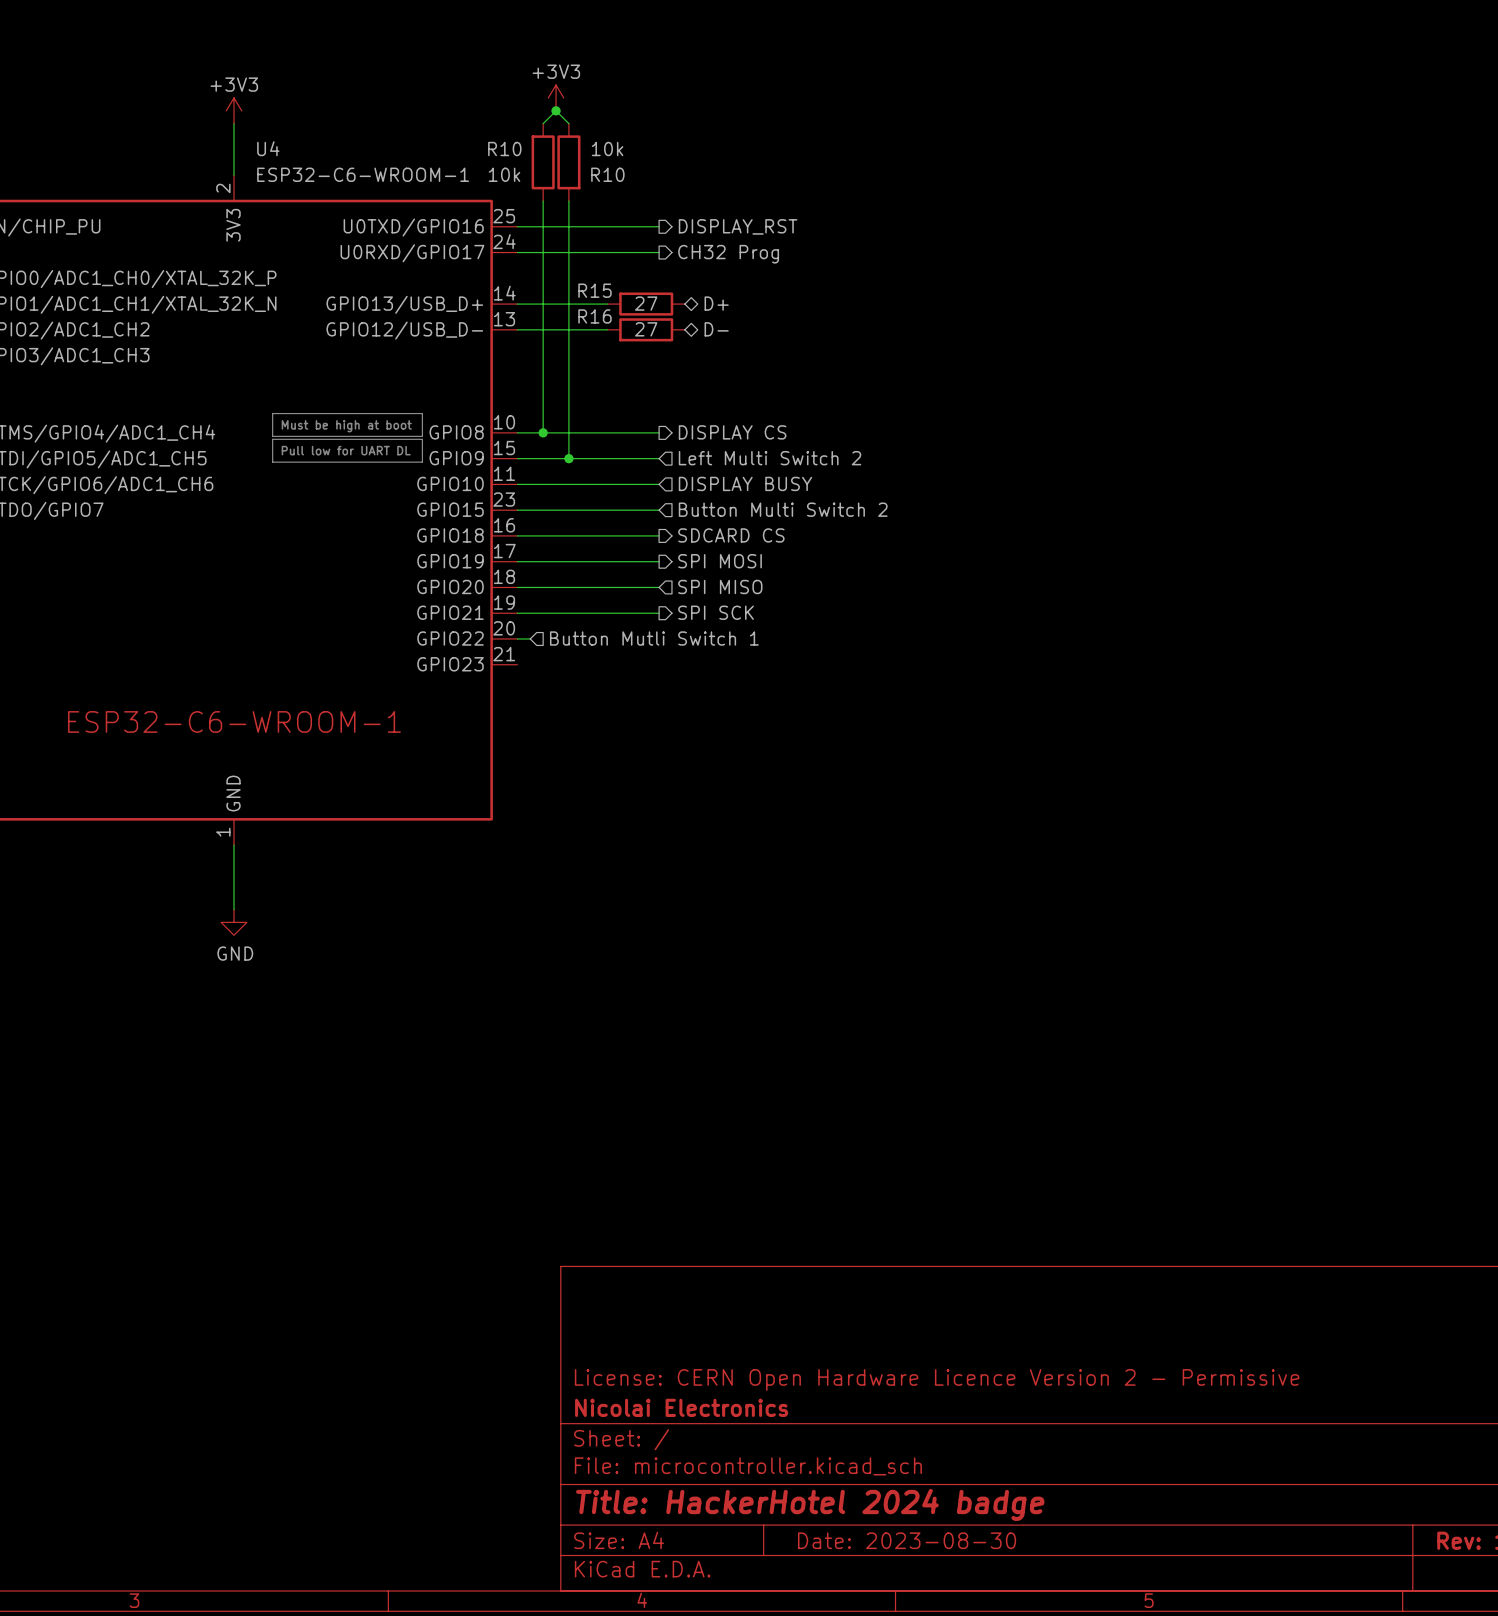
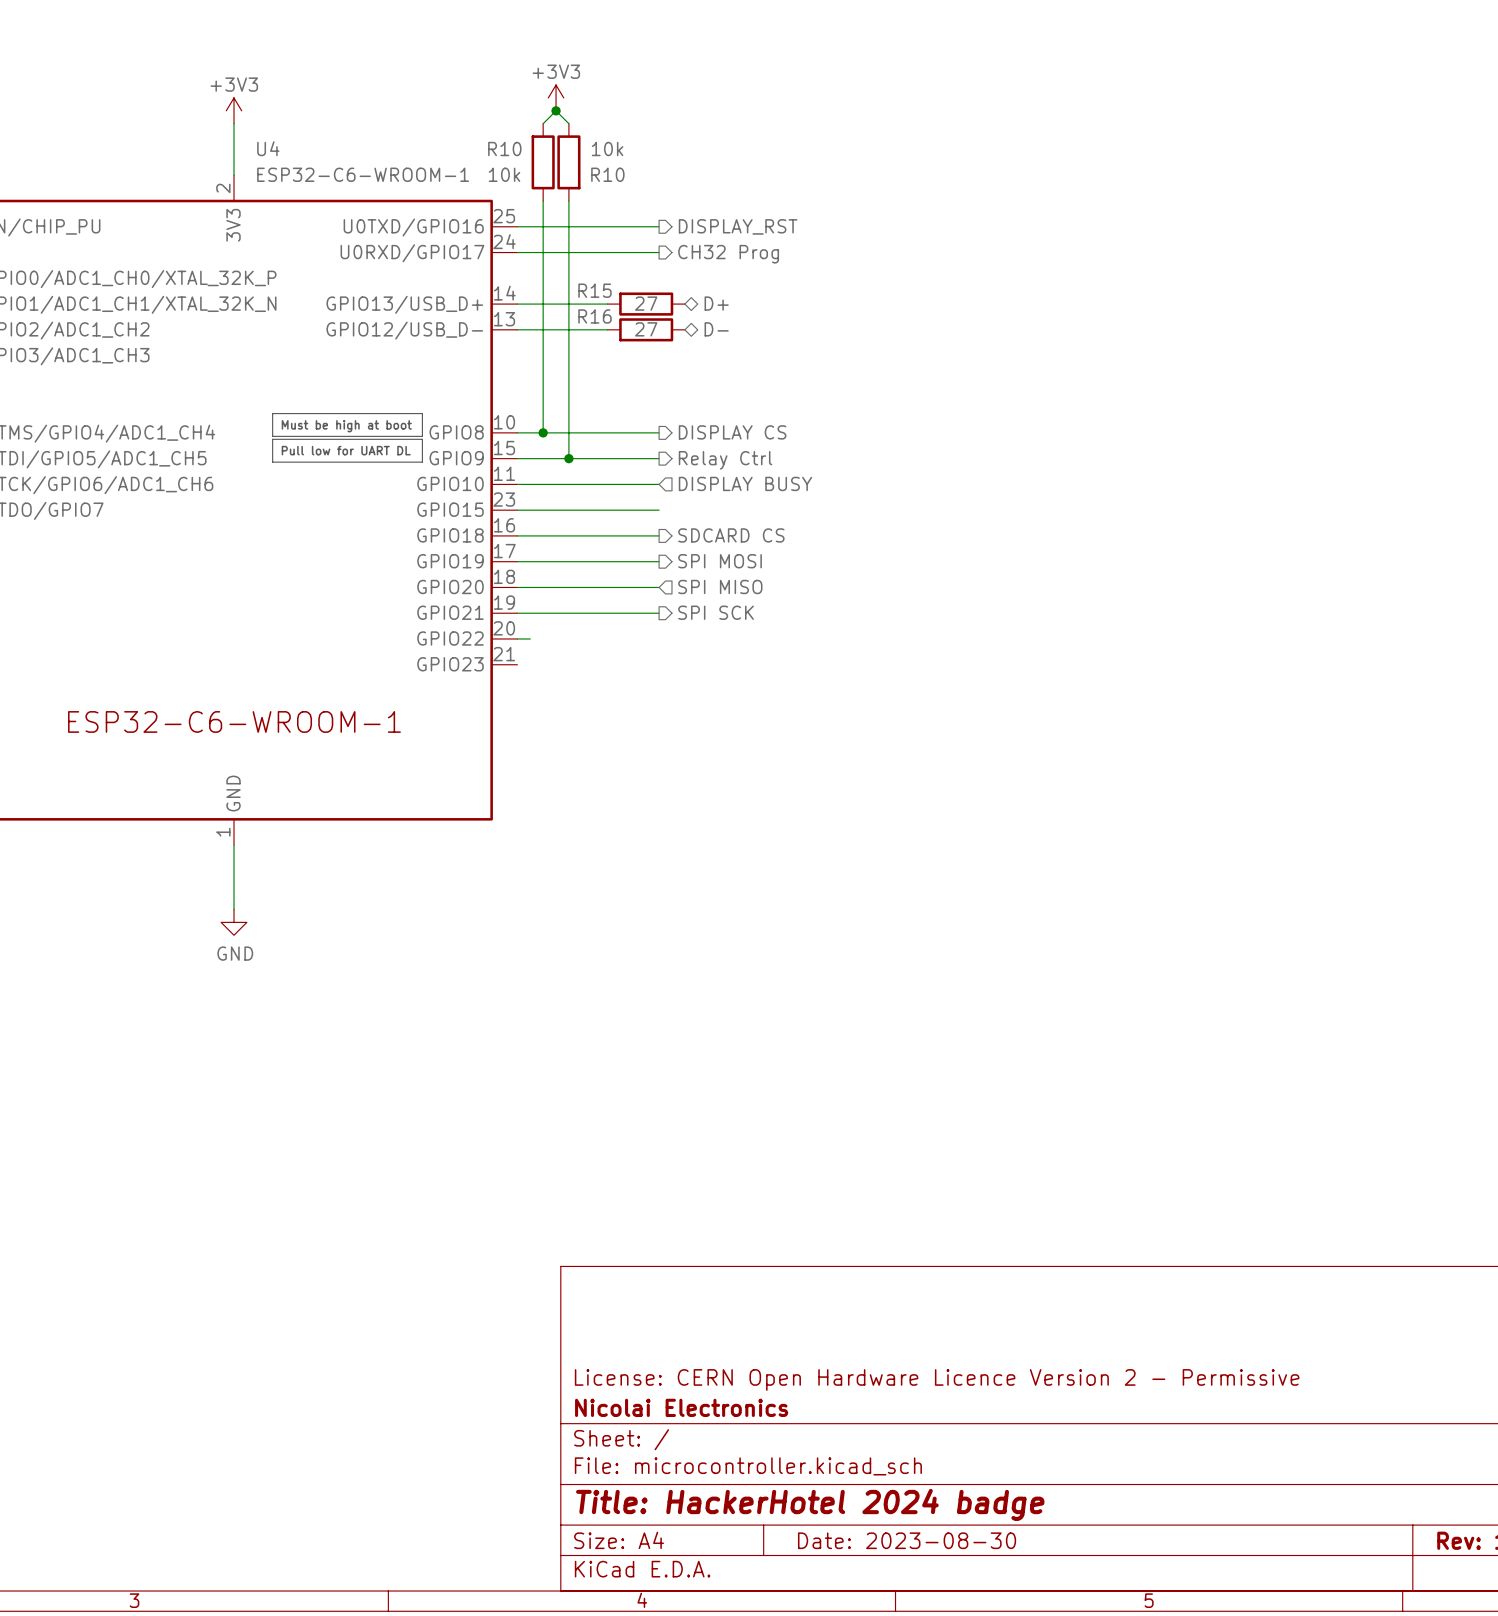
hierarchical label shape: input (770, 458) -> output (725, 460)
hierarchical label: Left Multi Switch 2 (770, 458) -> Relay Ctrl (725, 460)
hierarchical label: Button Multi Switch 2 (783, 509) -> none
hierarchical label: Button Mutli Switch 1 (654, 638) -> none

